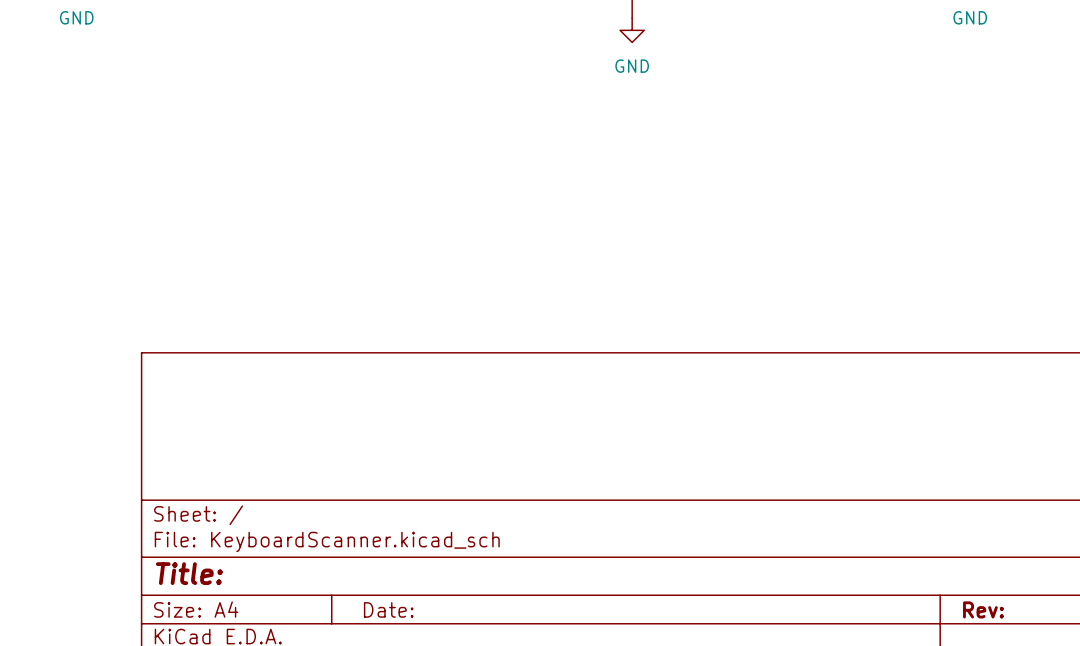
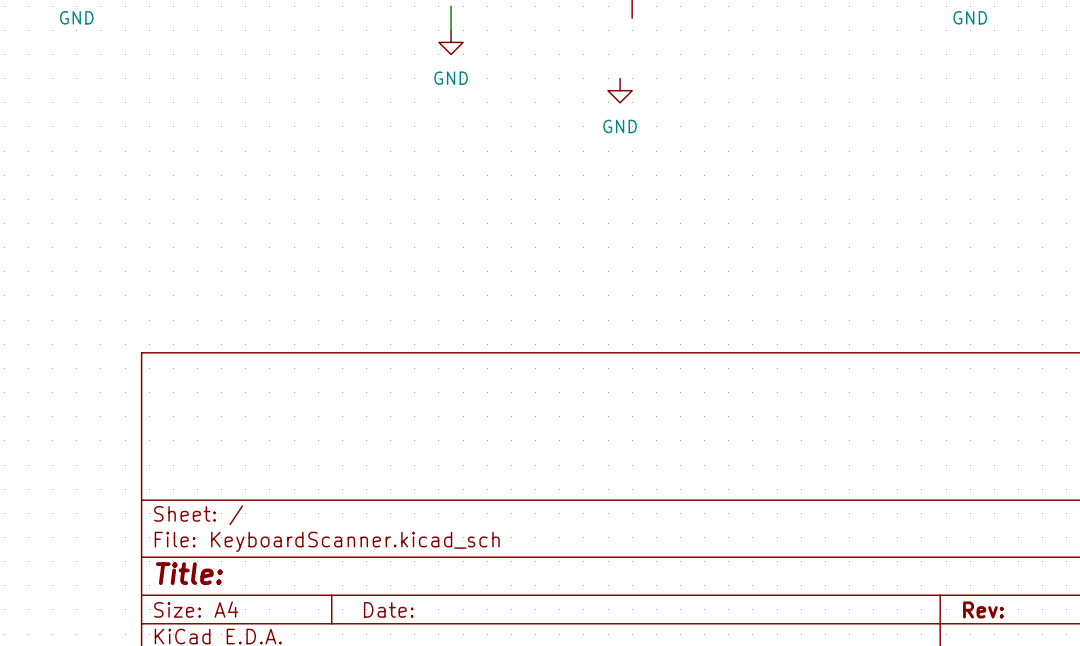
wire: none -> (451, 6) (451, 30)
power symbol position: GND (632, 30) -> GND (620, 90)
power symbol: none -> GND (451, 42)

